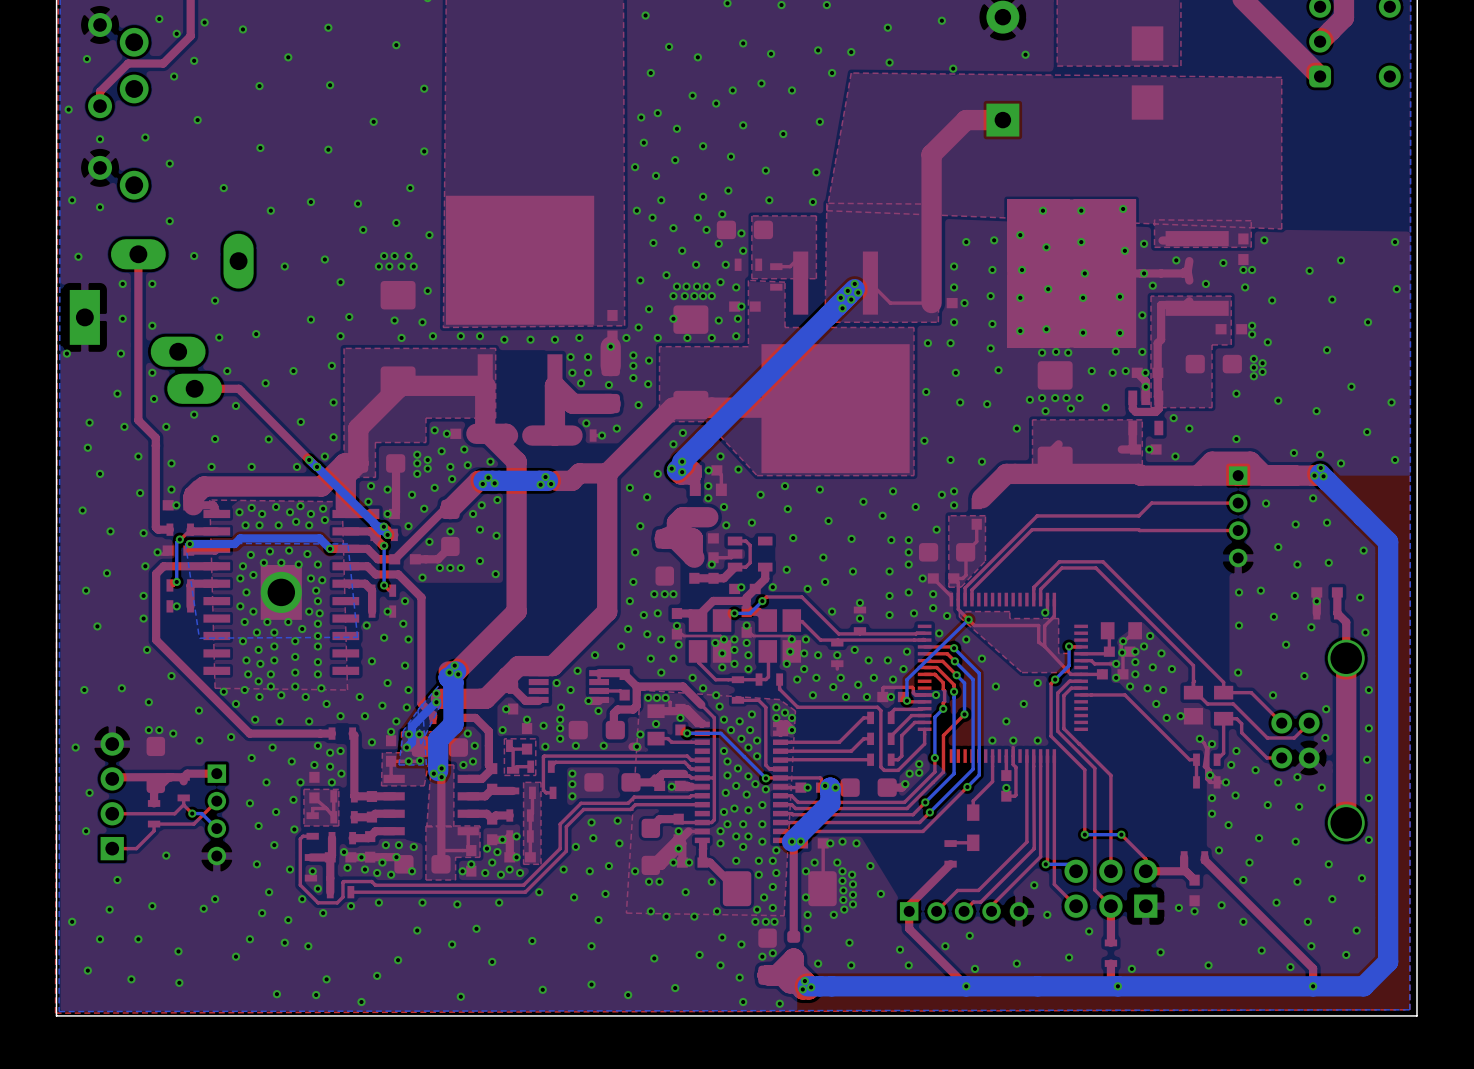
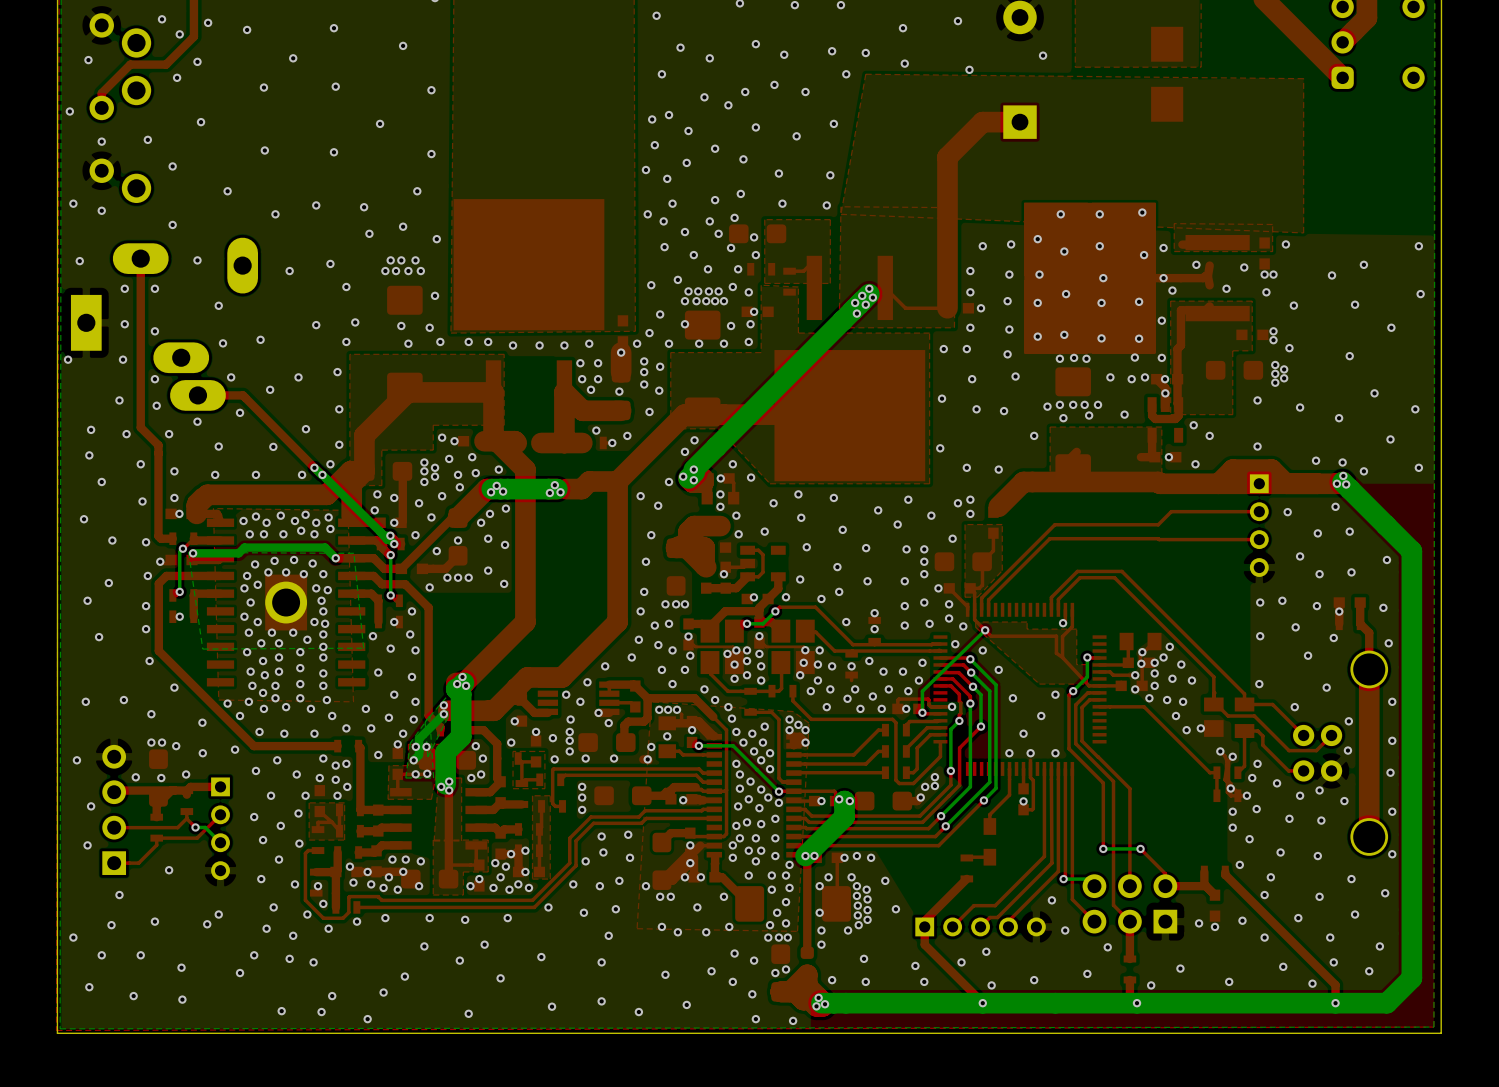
via: none -> (186, 774)
via: none -> (135, 777)
via: none -> (161, 778)

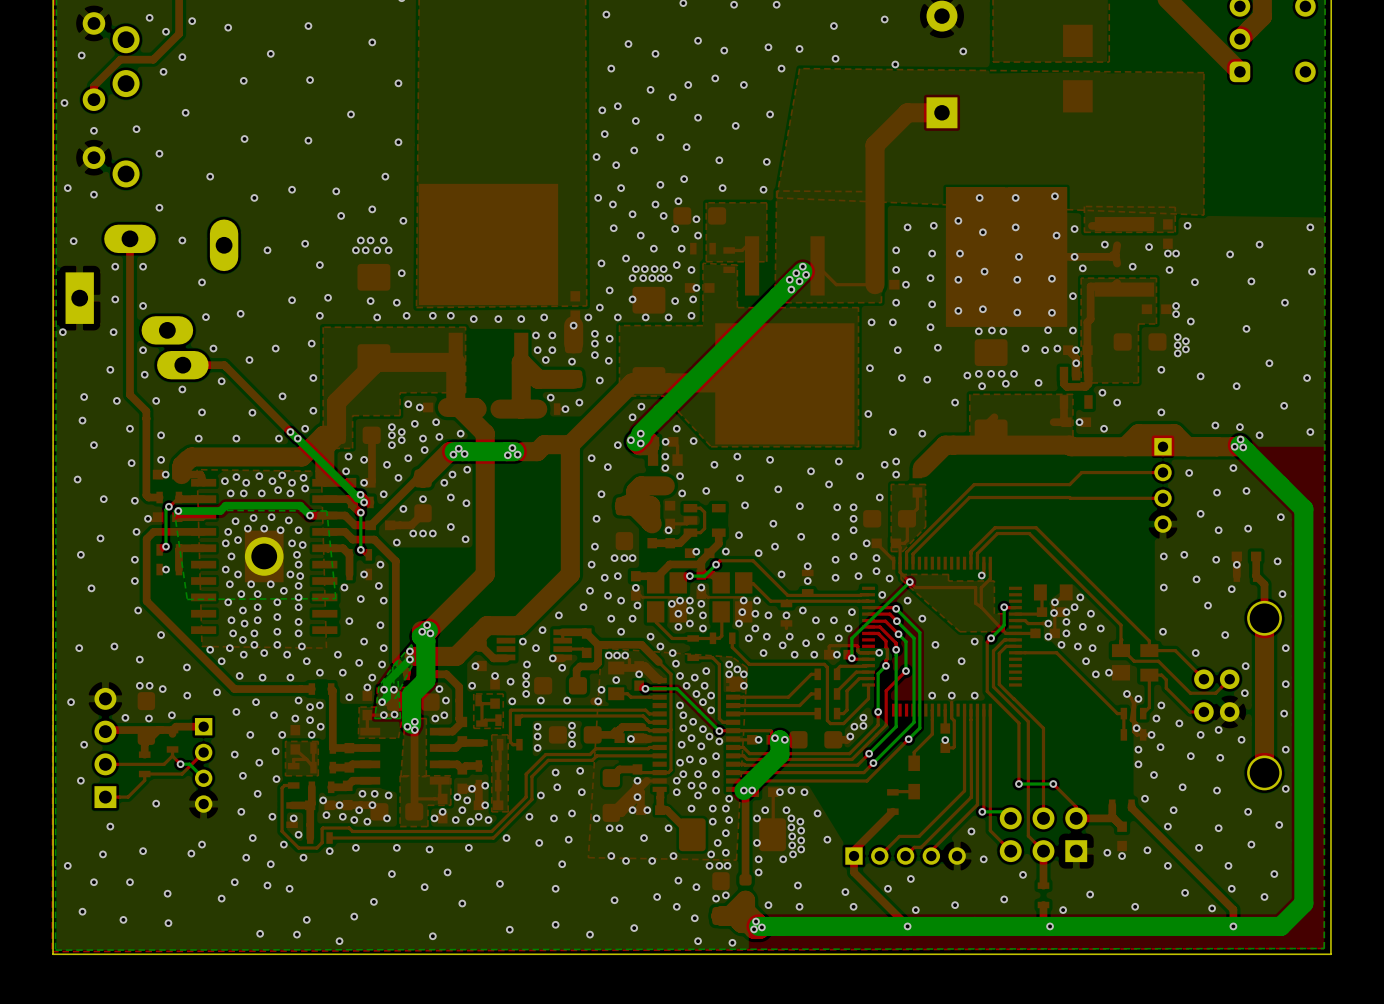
via: none -> (572, 725)
via: none -> (572, 734)
via: none -> (572, 744)

